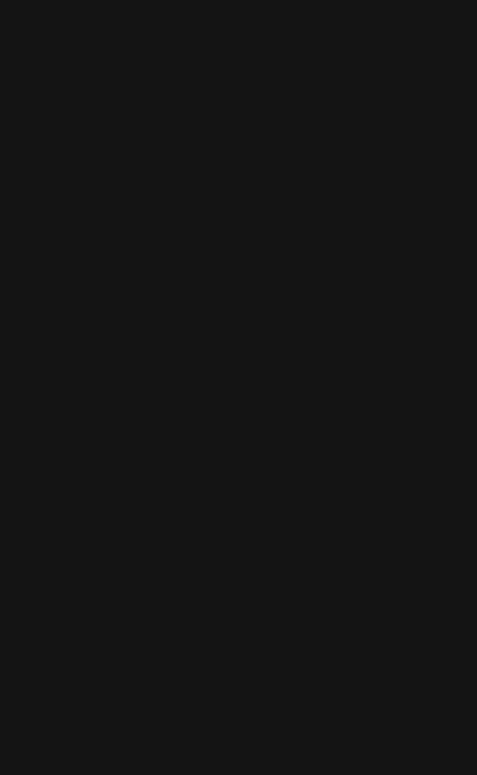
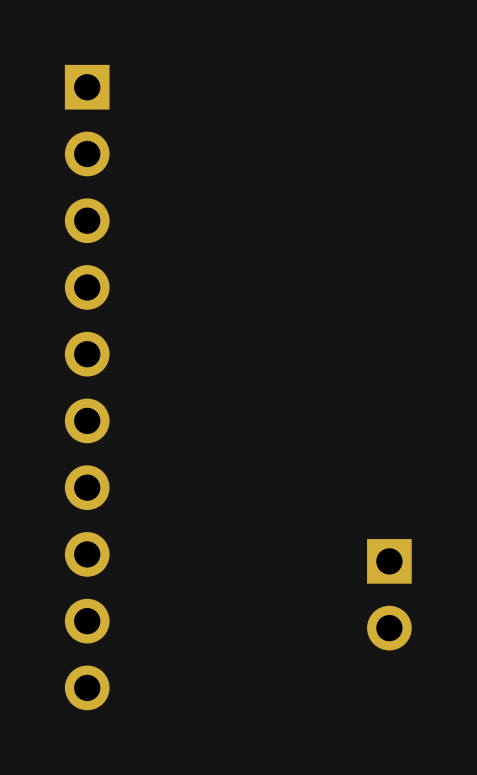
part: none -> (87, 387)
part: none -> (389, 594)

